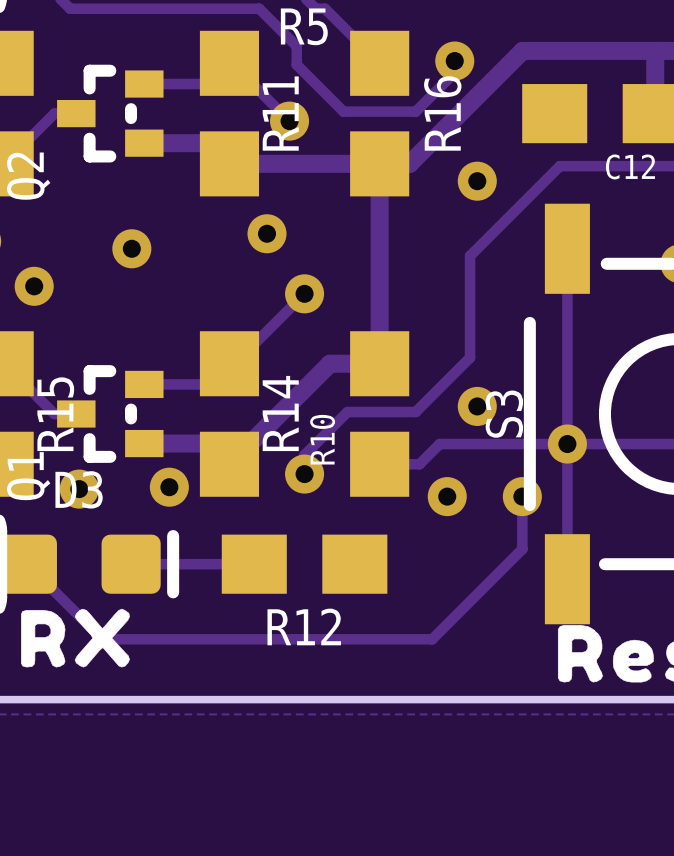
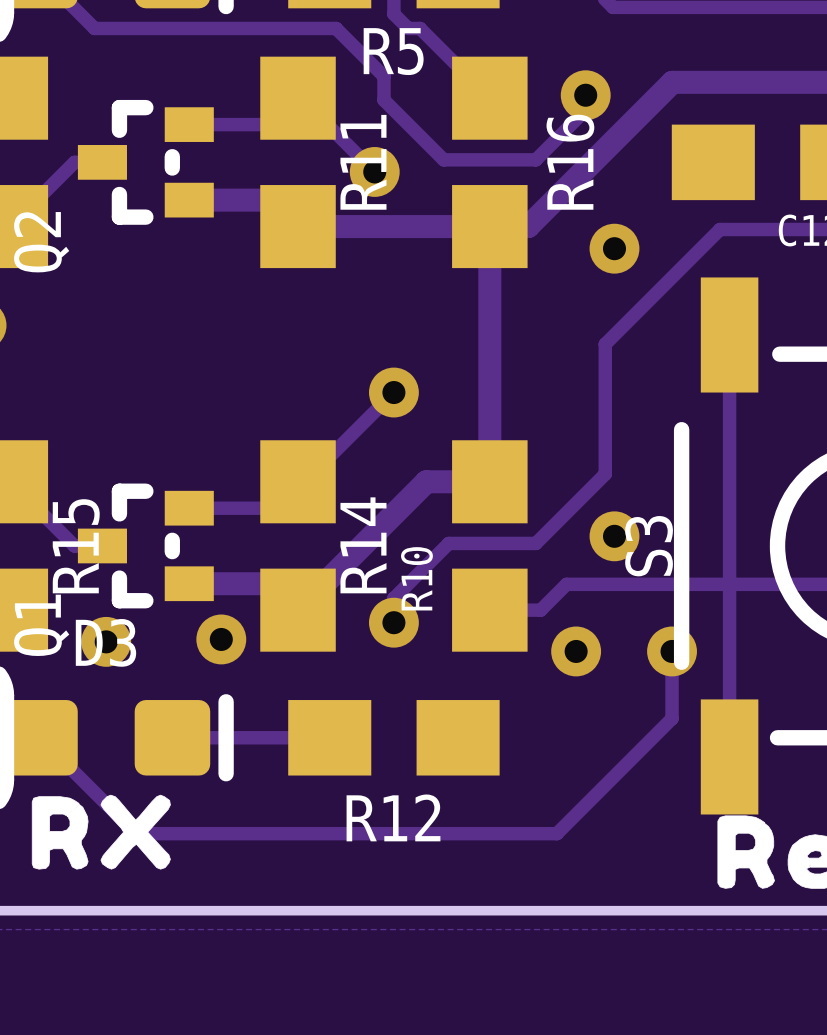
via: (267, 233) -> none
via: (131, 248) -> none
via: (34, 286) -> none
via: (567, 444) -> none

